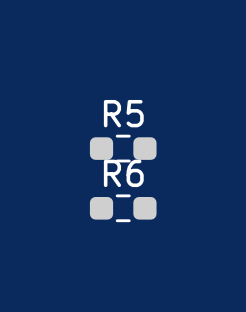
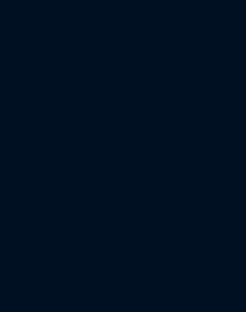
R5: (123, 148) -> none
R6: (123, 208) -> none

